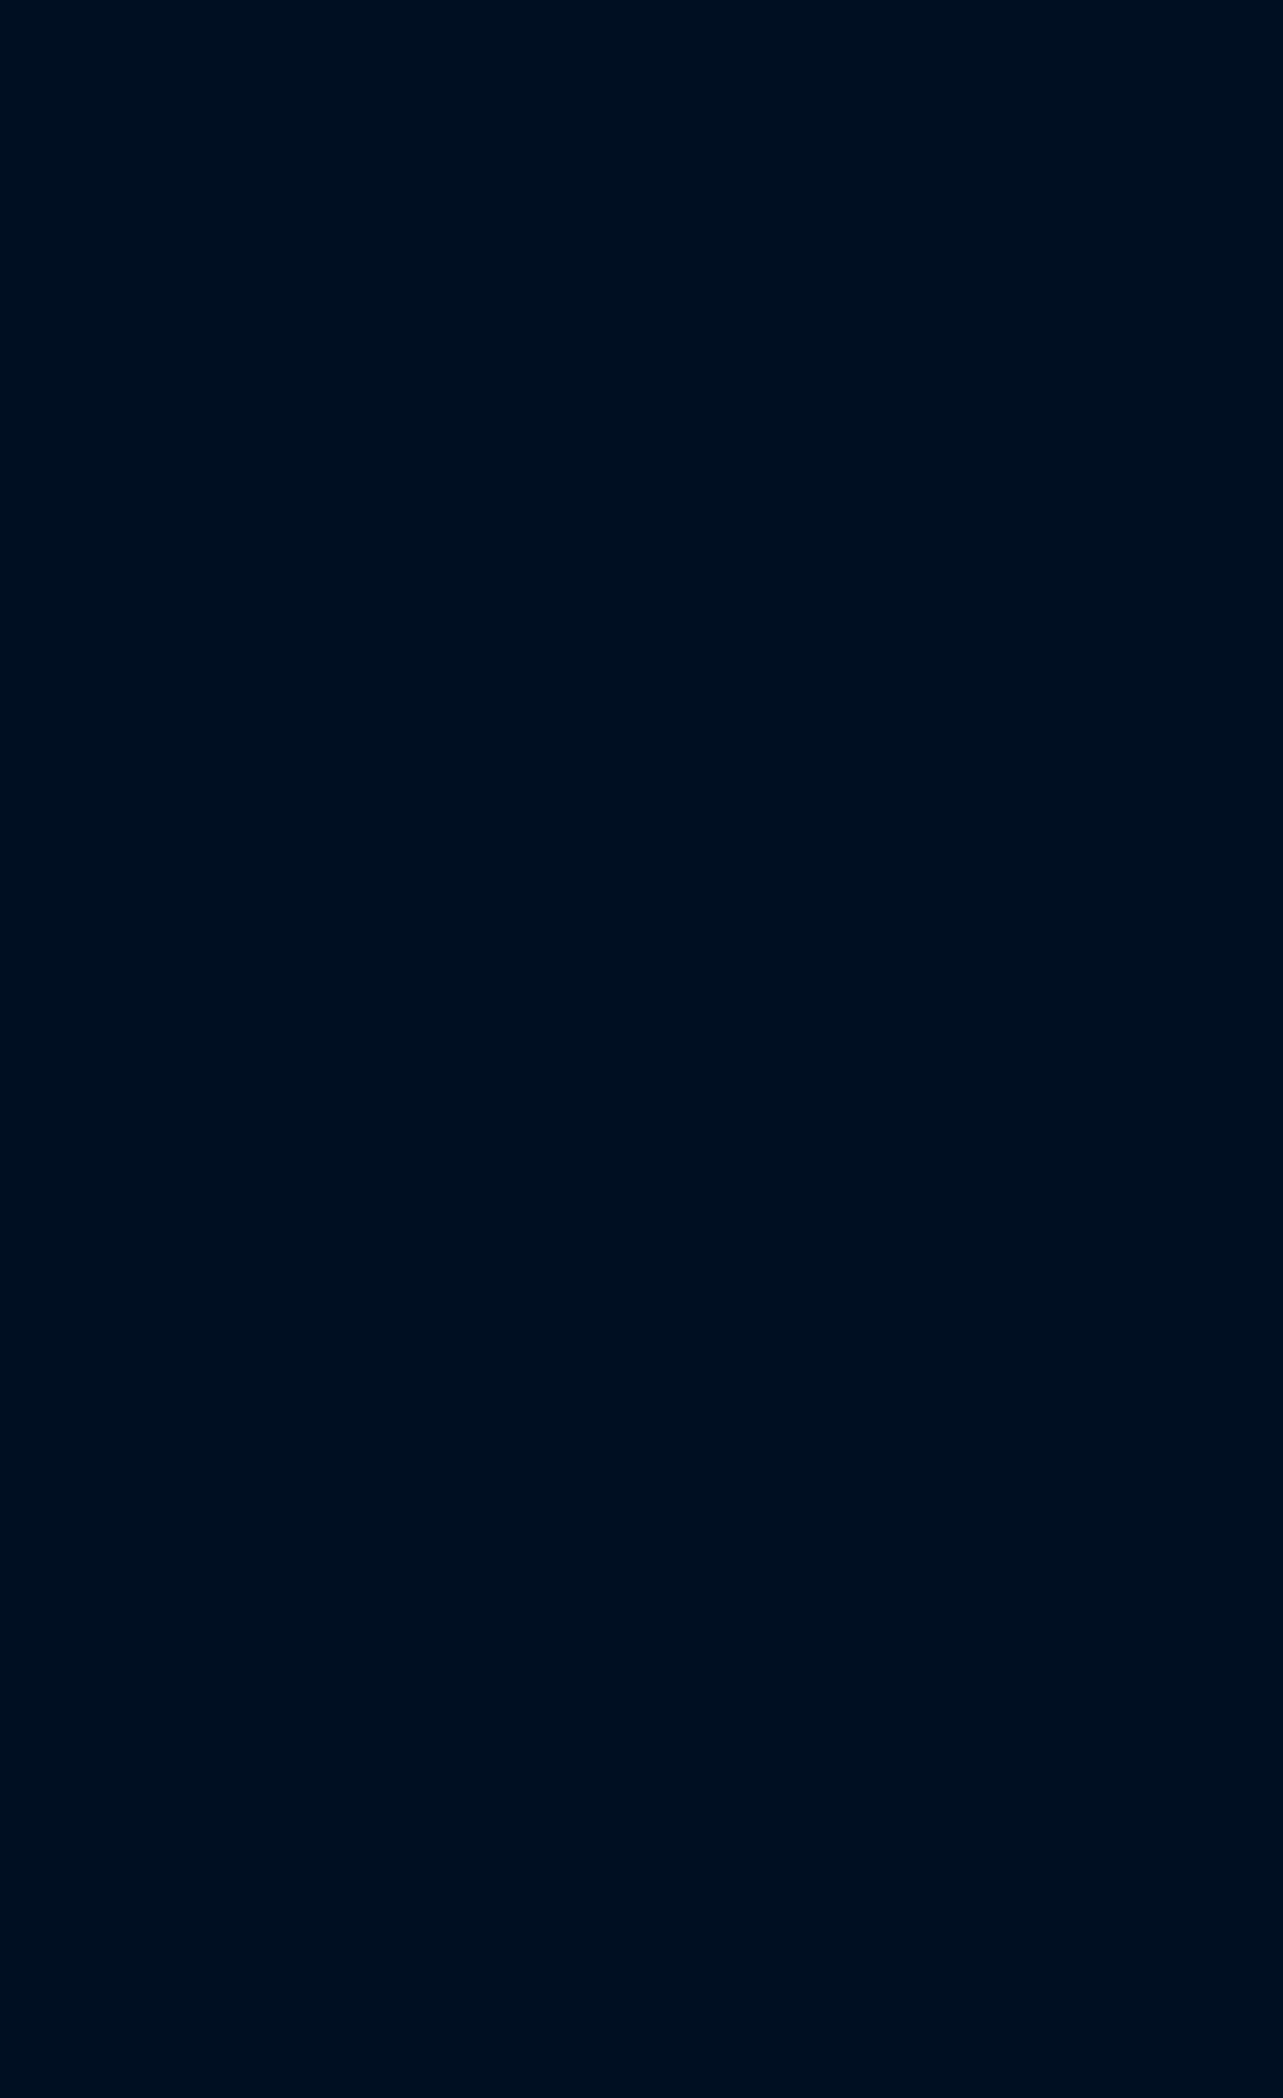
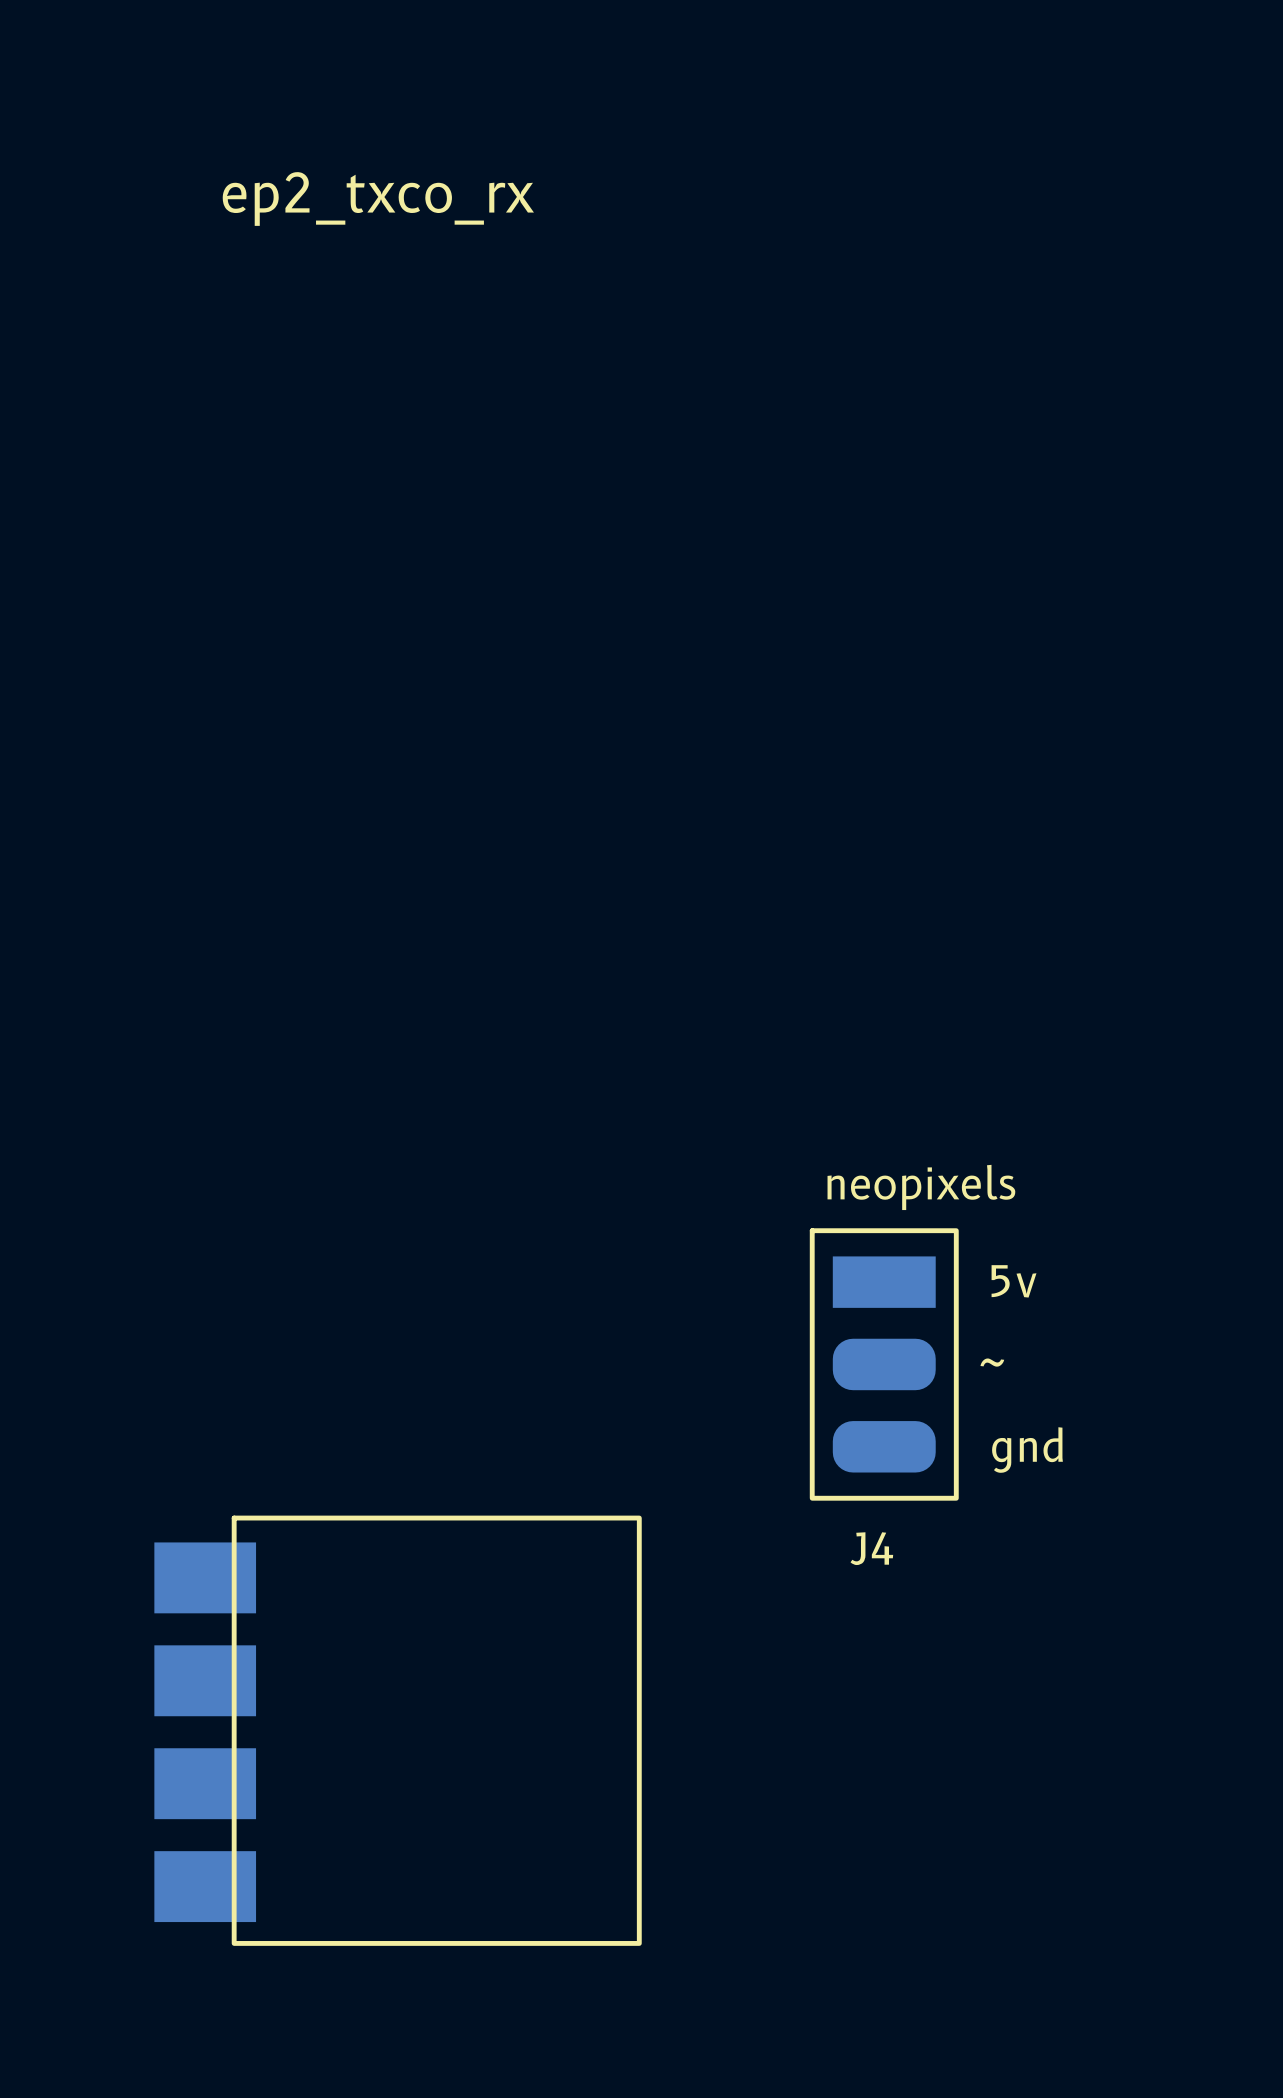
J4: none -> neopixels (884, 1364)
part: none -> ep2_txco_rx (398, 1730)

